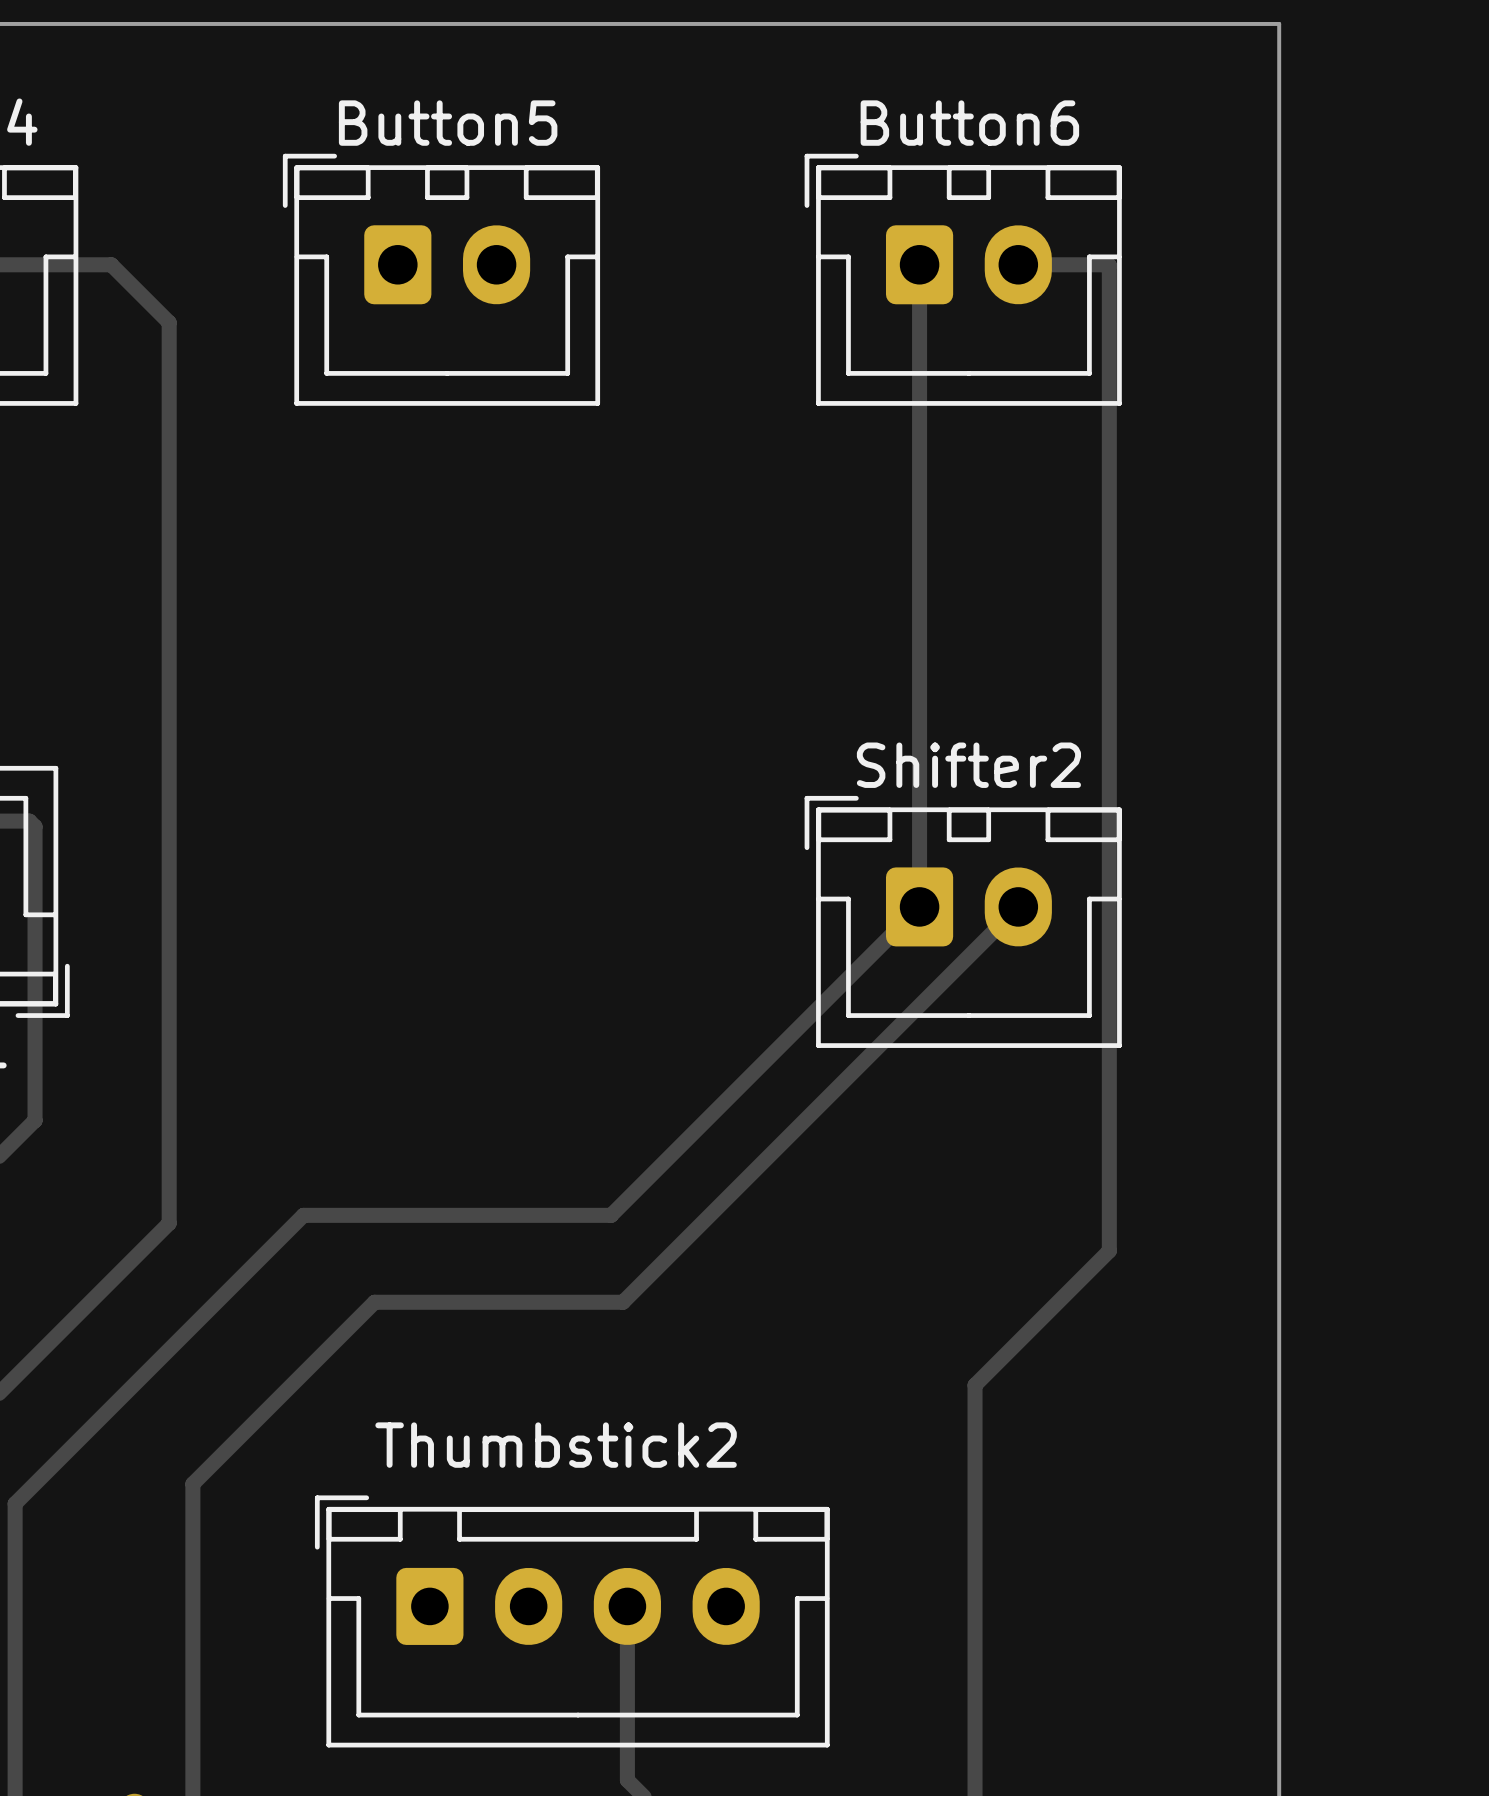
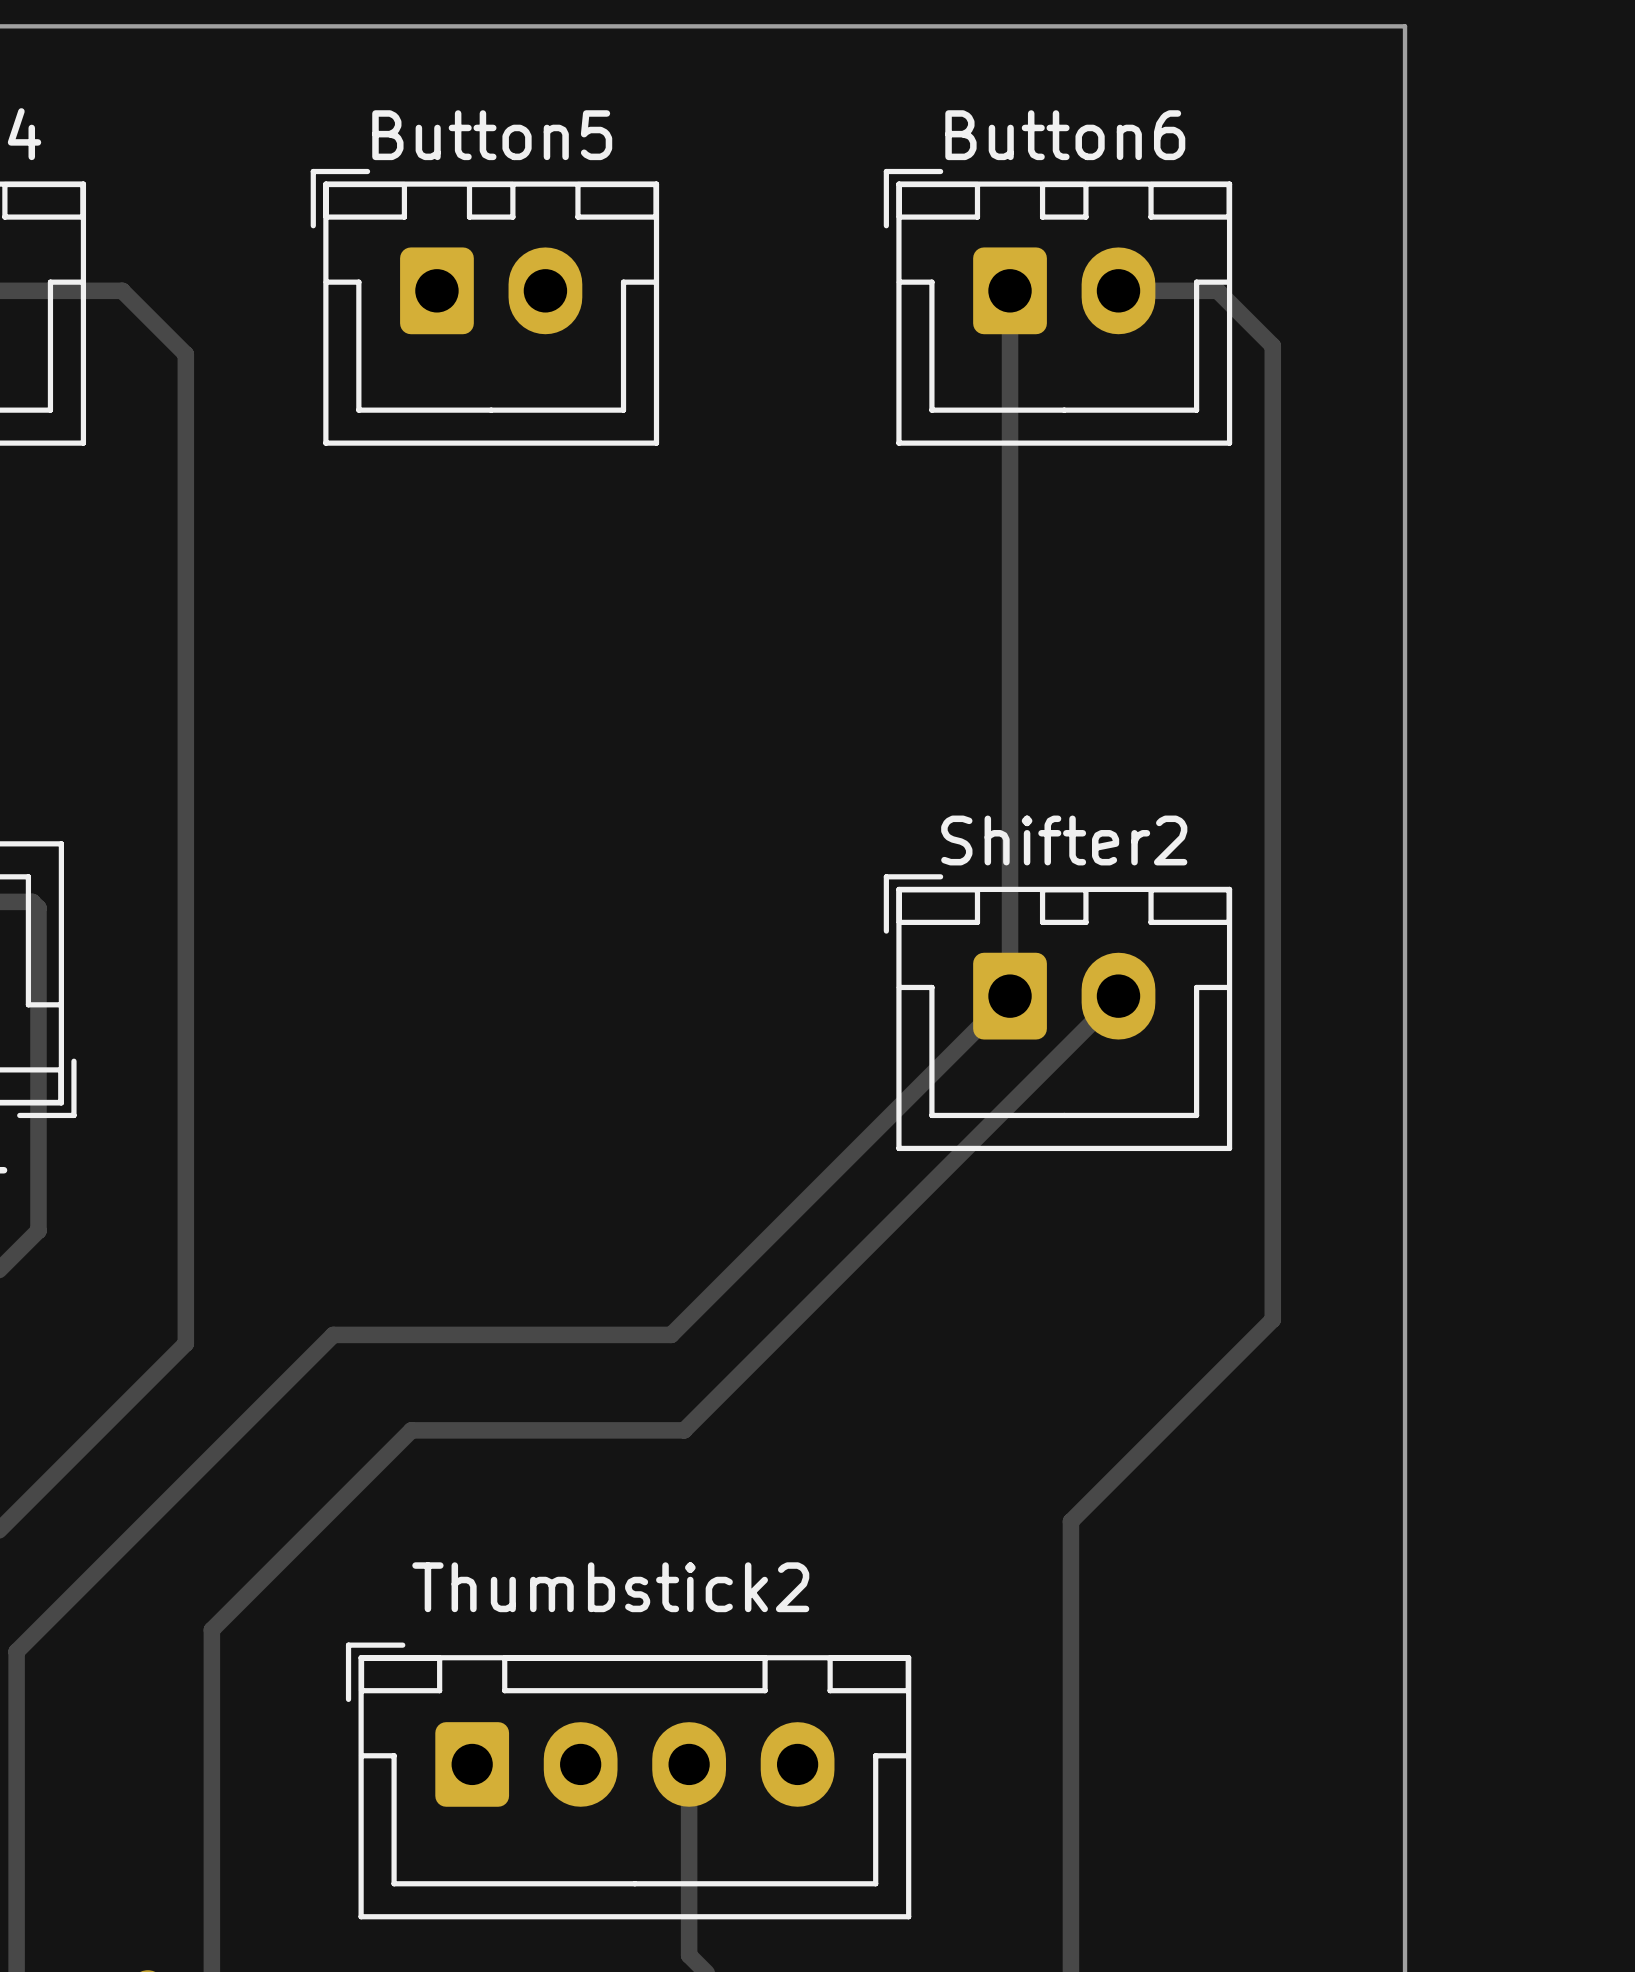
track: (1109, 265) (1109, 1250) -> (1218, 291) (1272, 345) (1272, 1319) (1218, 1373)

